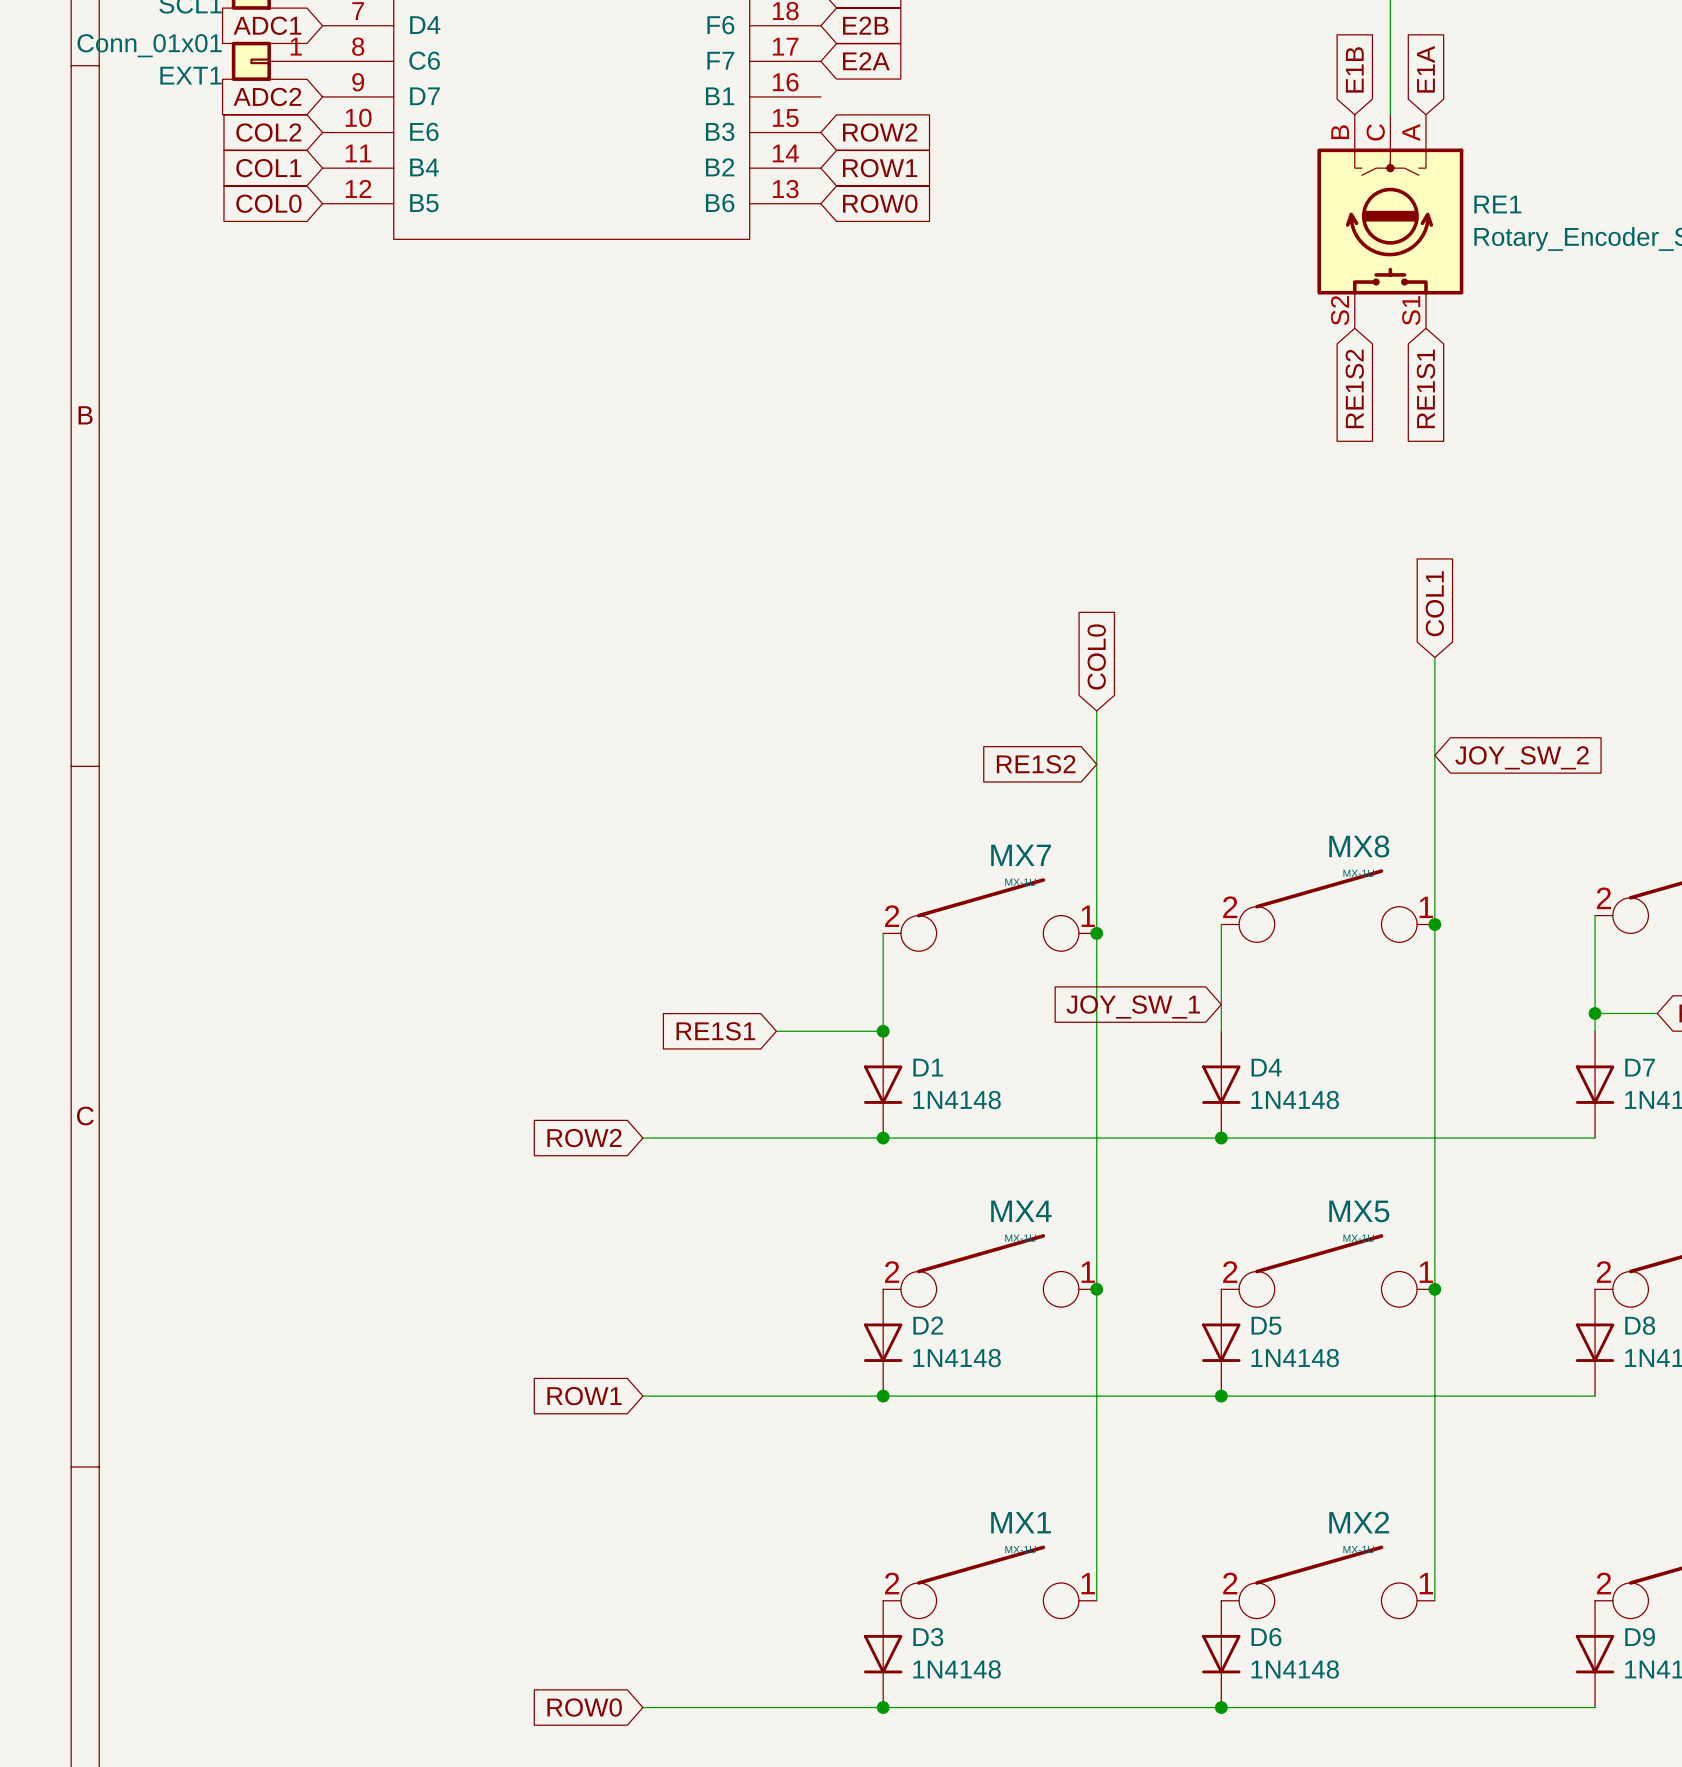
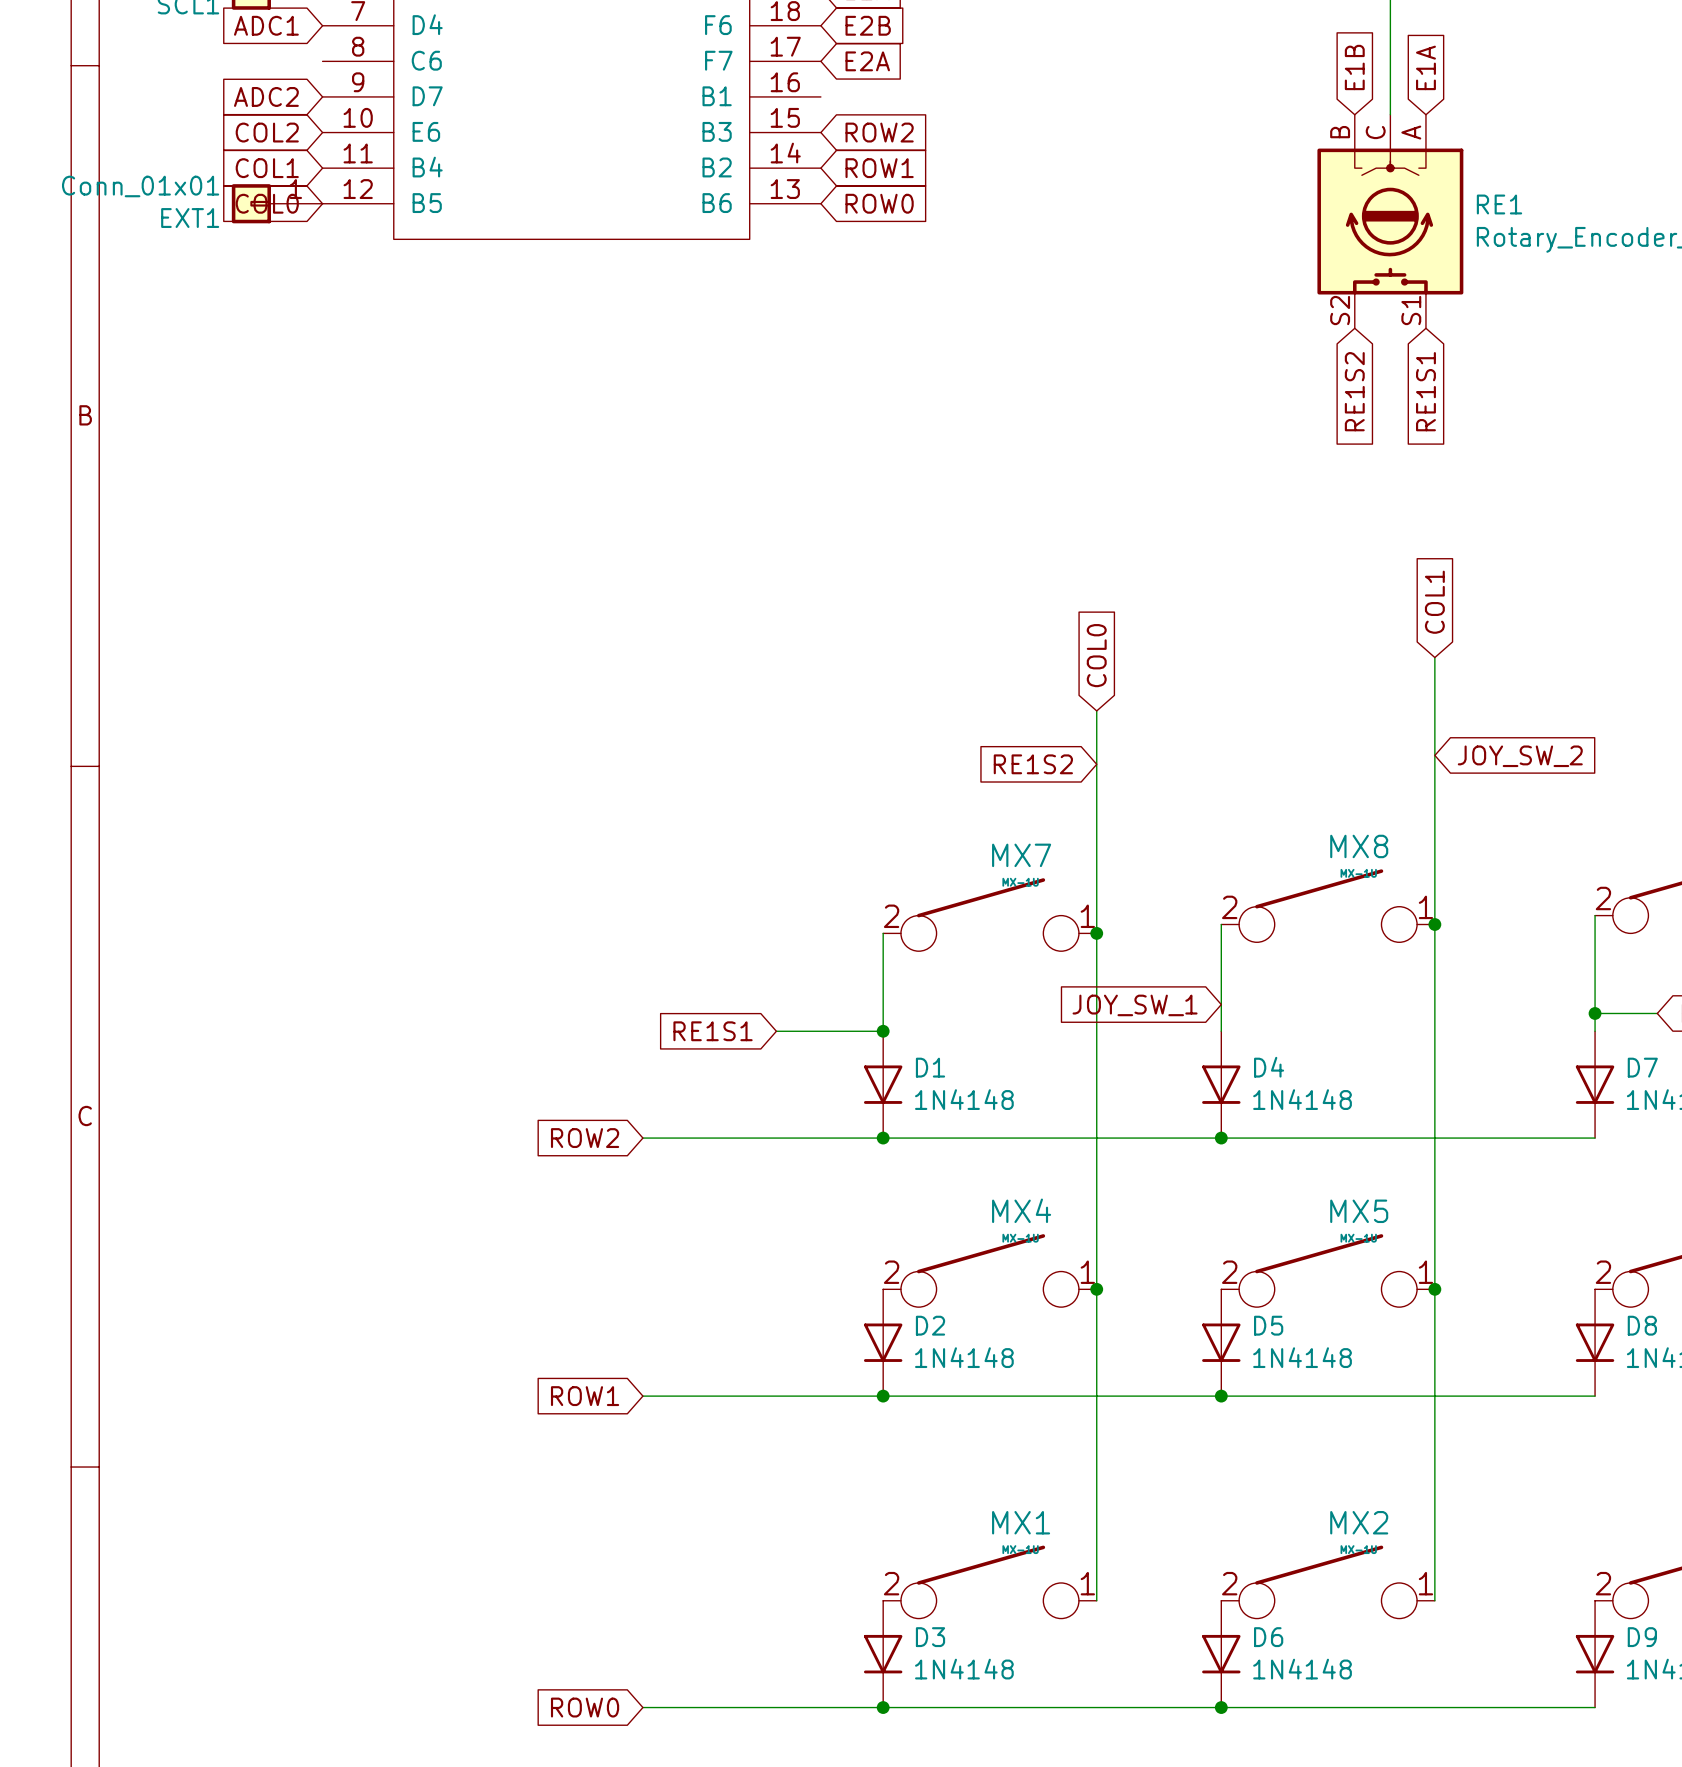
EXT1 position: (277, 61) -> (277, 203)

